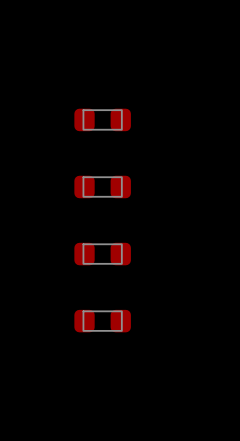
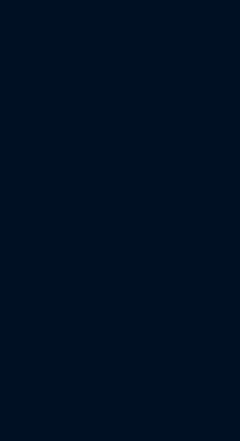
part: (102, 119) -> none
part: (102, 186) -> none
part: (102, 254) -> none
part: (102, 321) -> none

